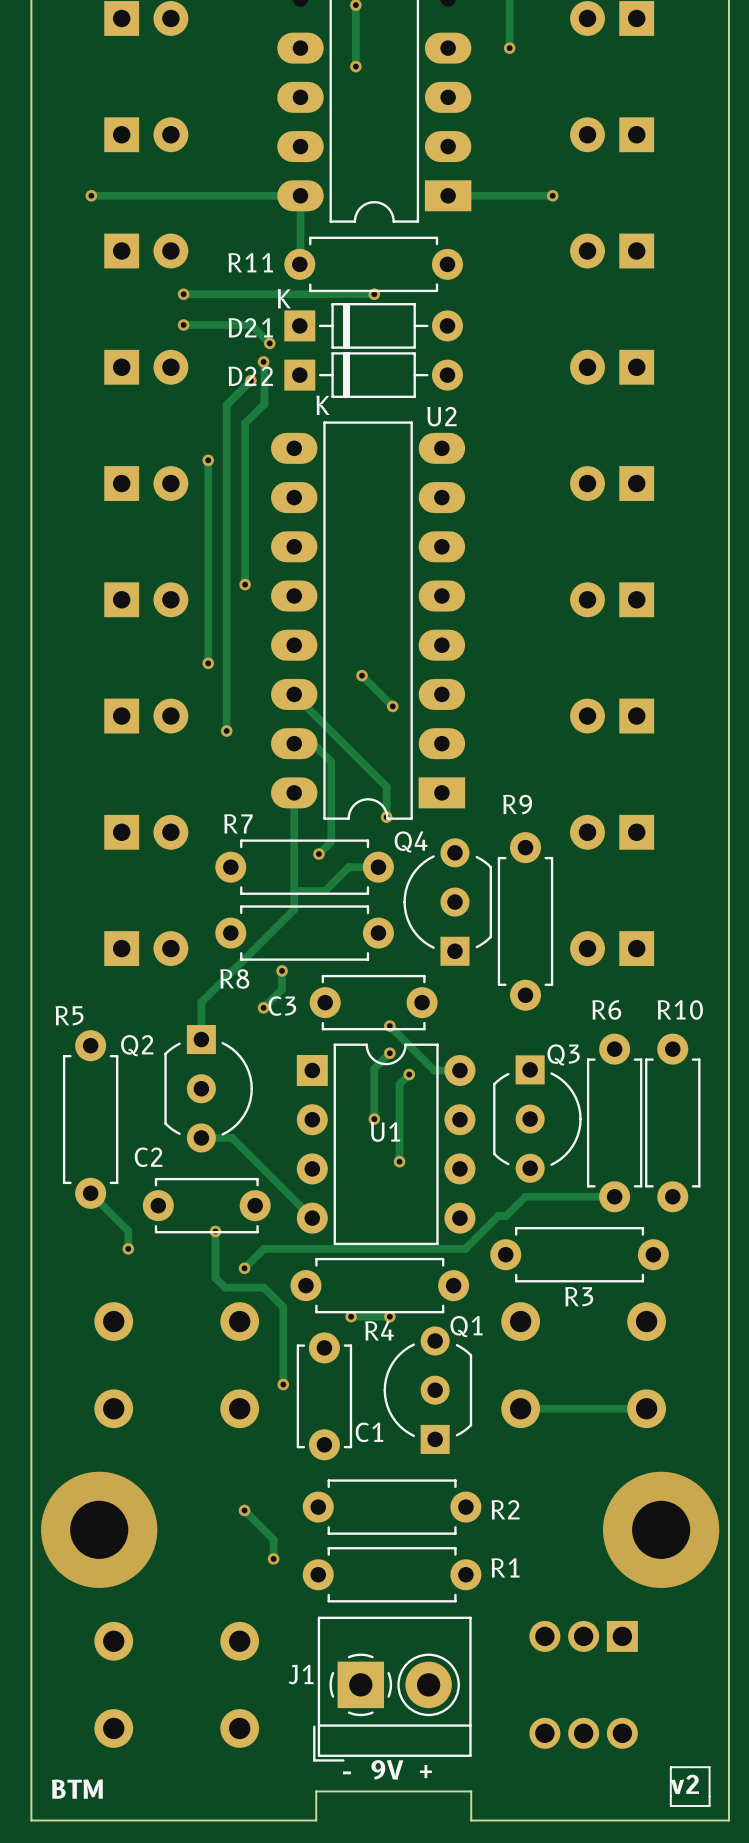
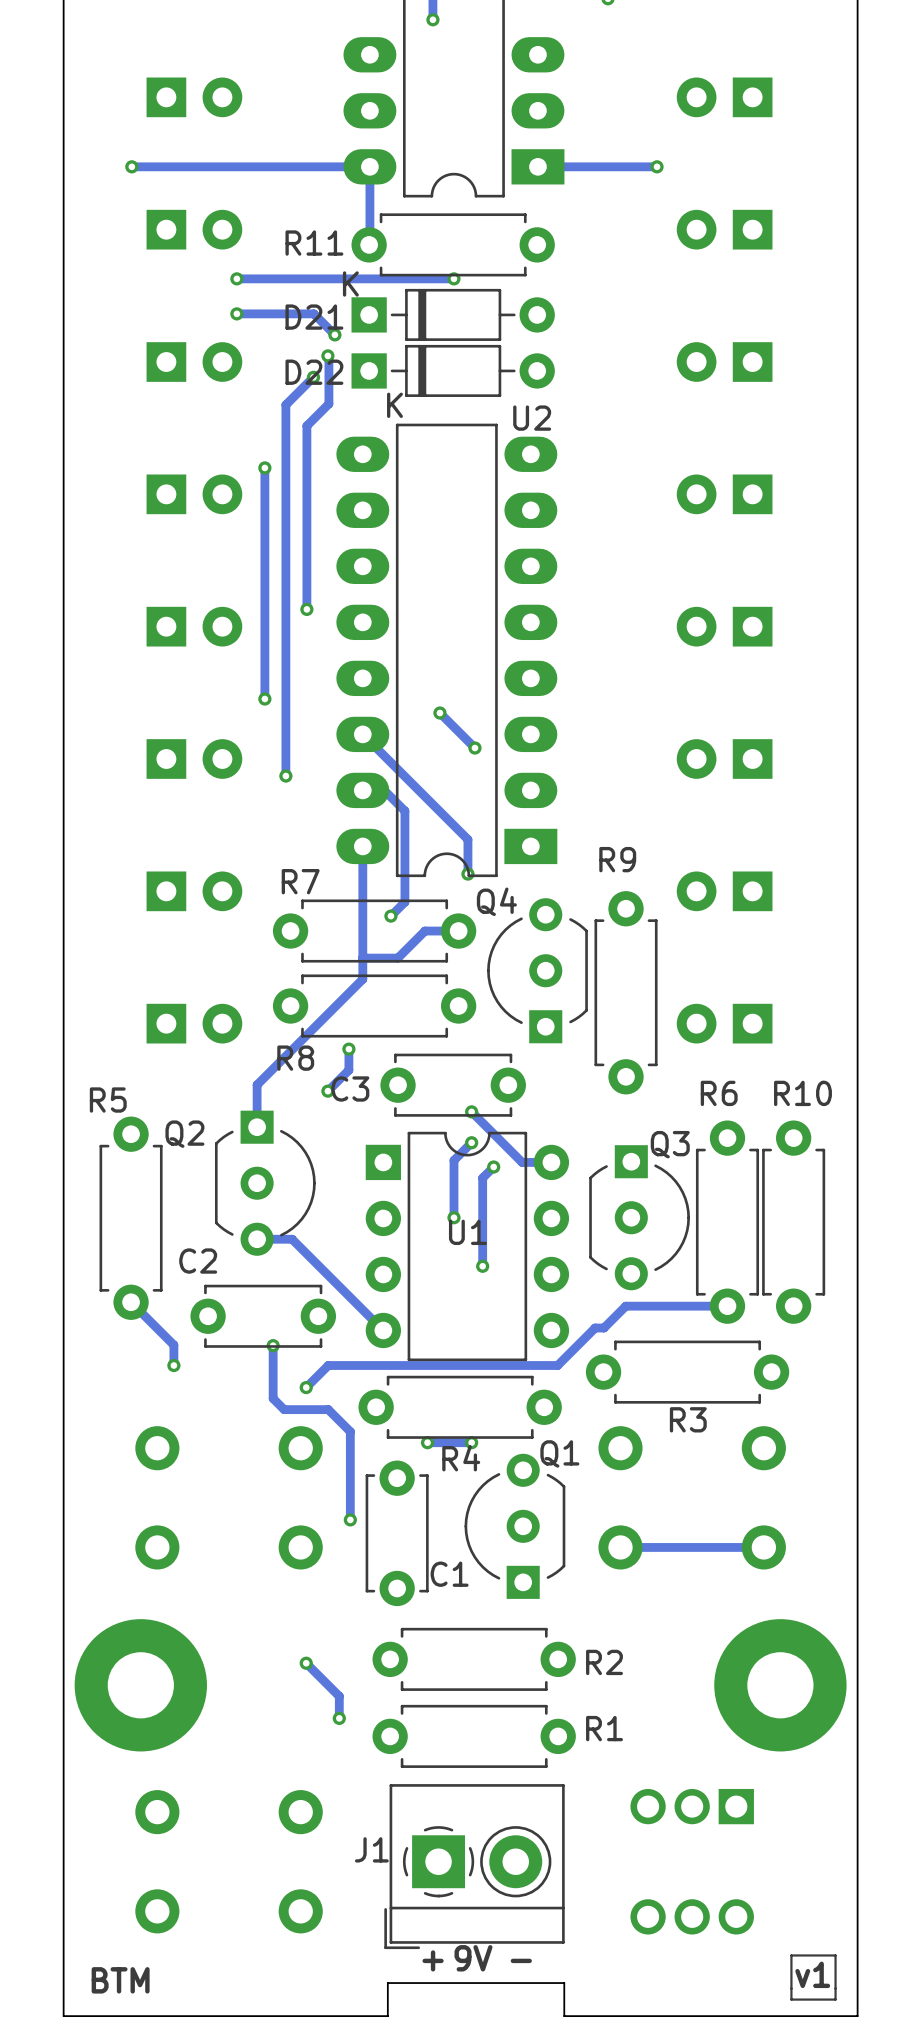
text: + (425, 1771) -> - (521, 1960)
text: - (346, 1772) -> + (433, 1960)
text: v2 (684, 1784) -> v1 (812, 1974)

